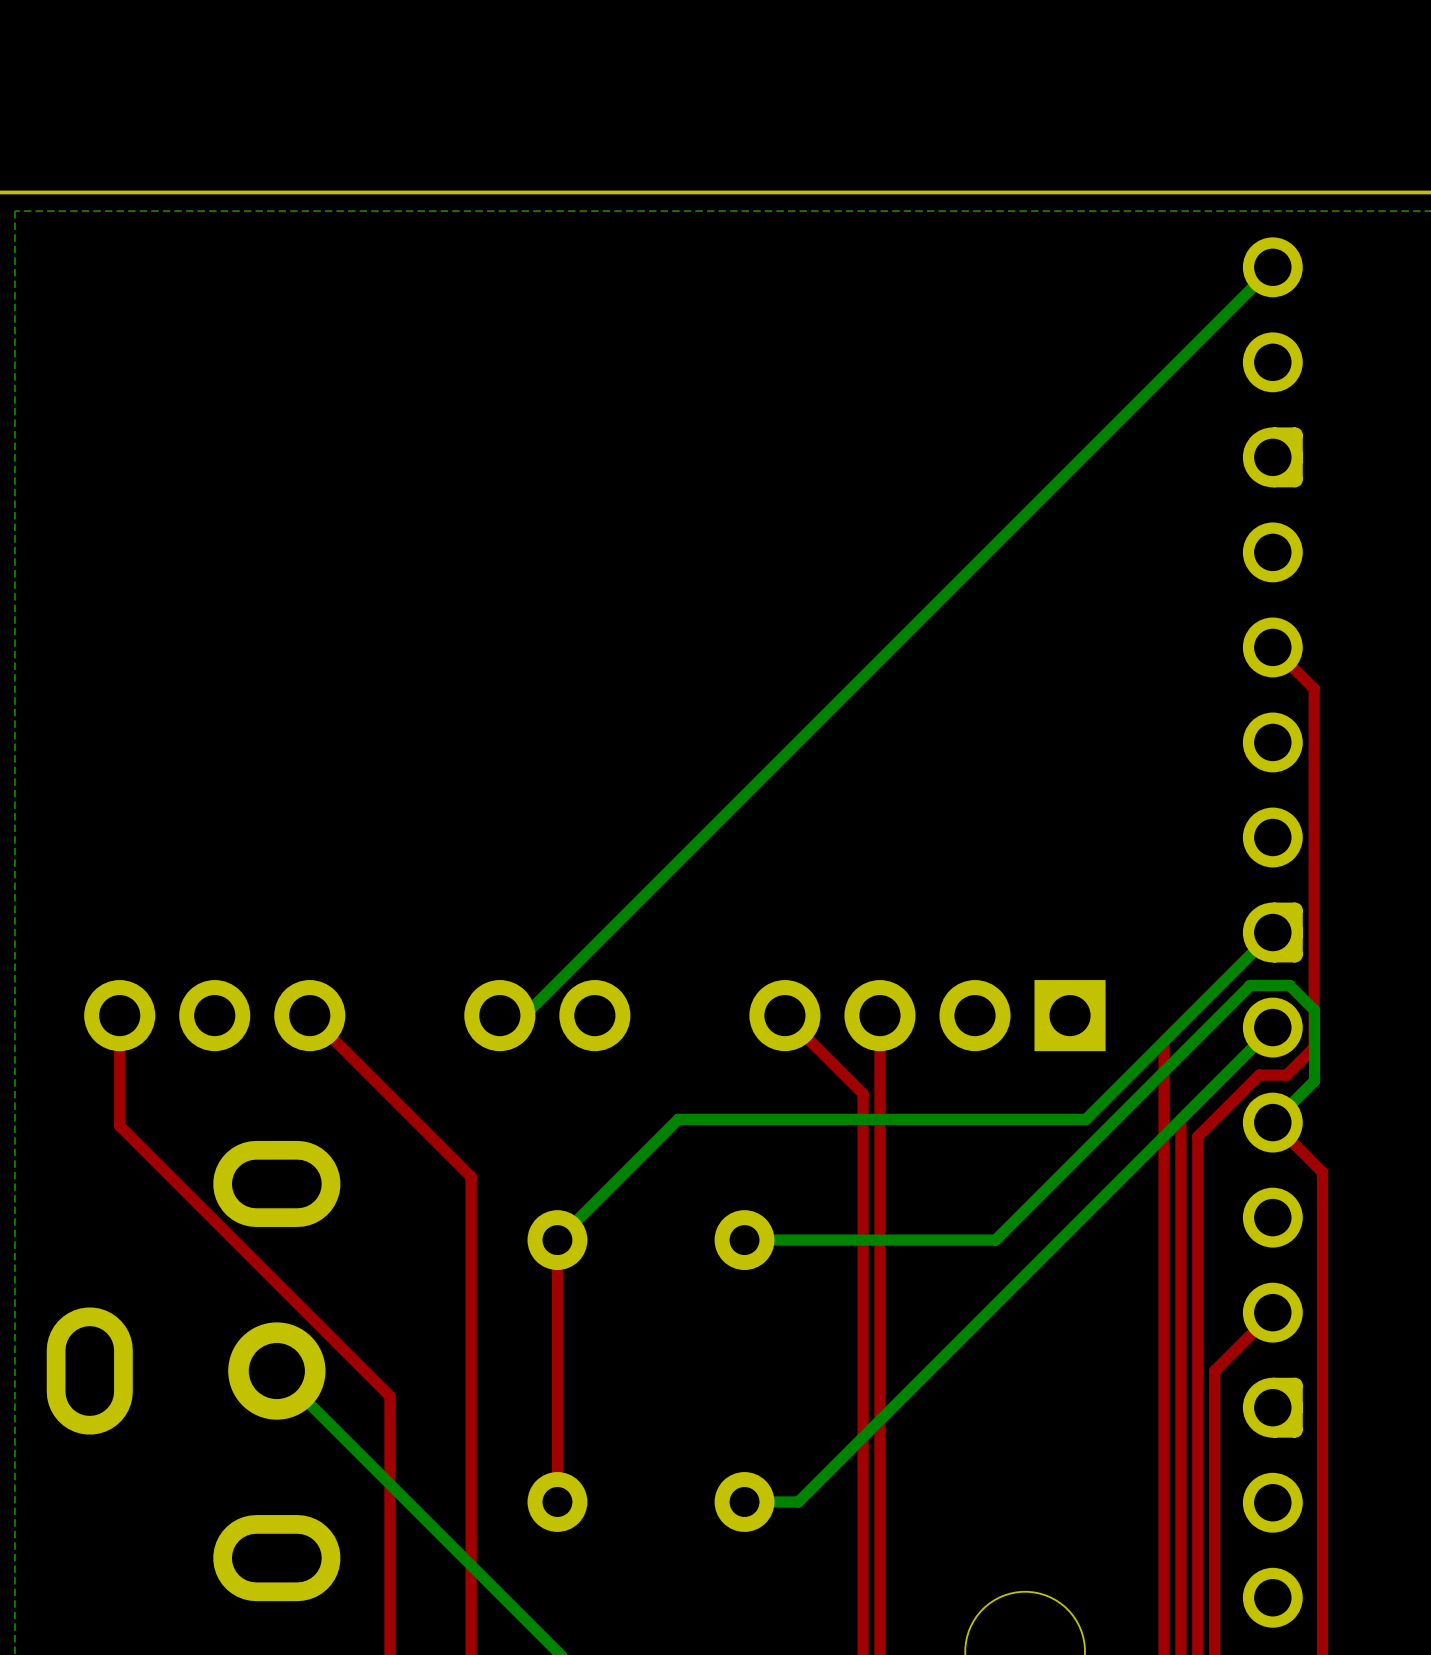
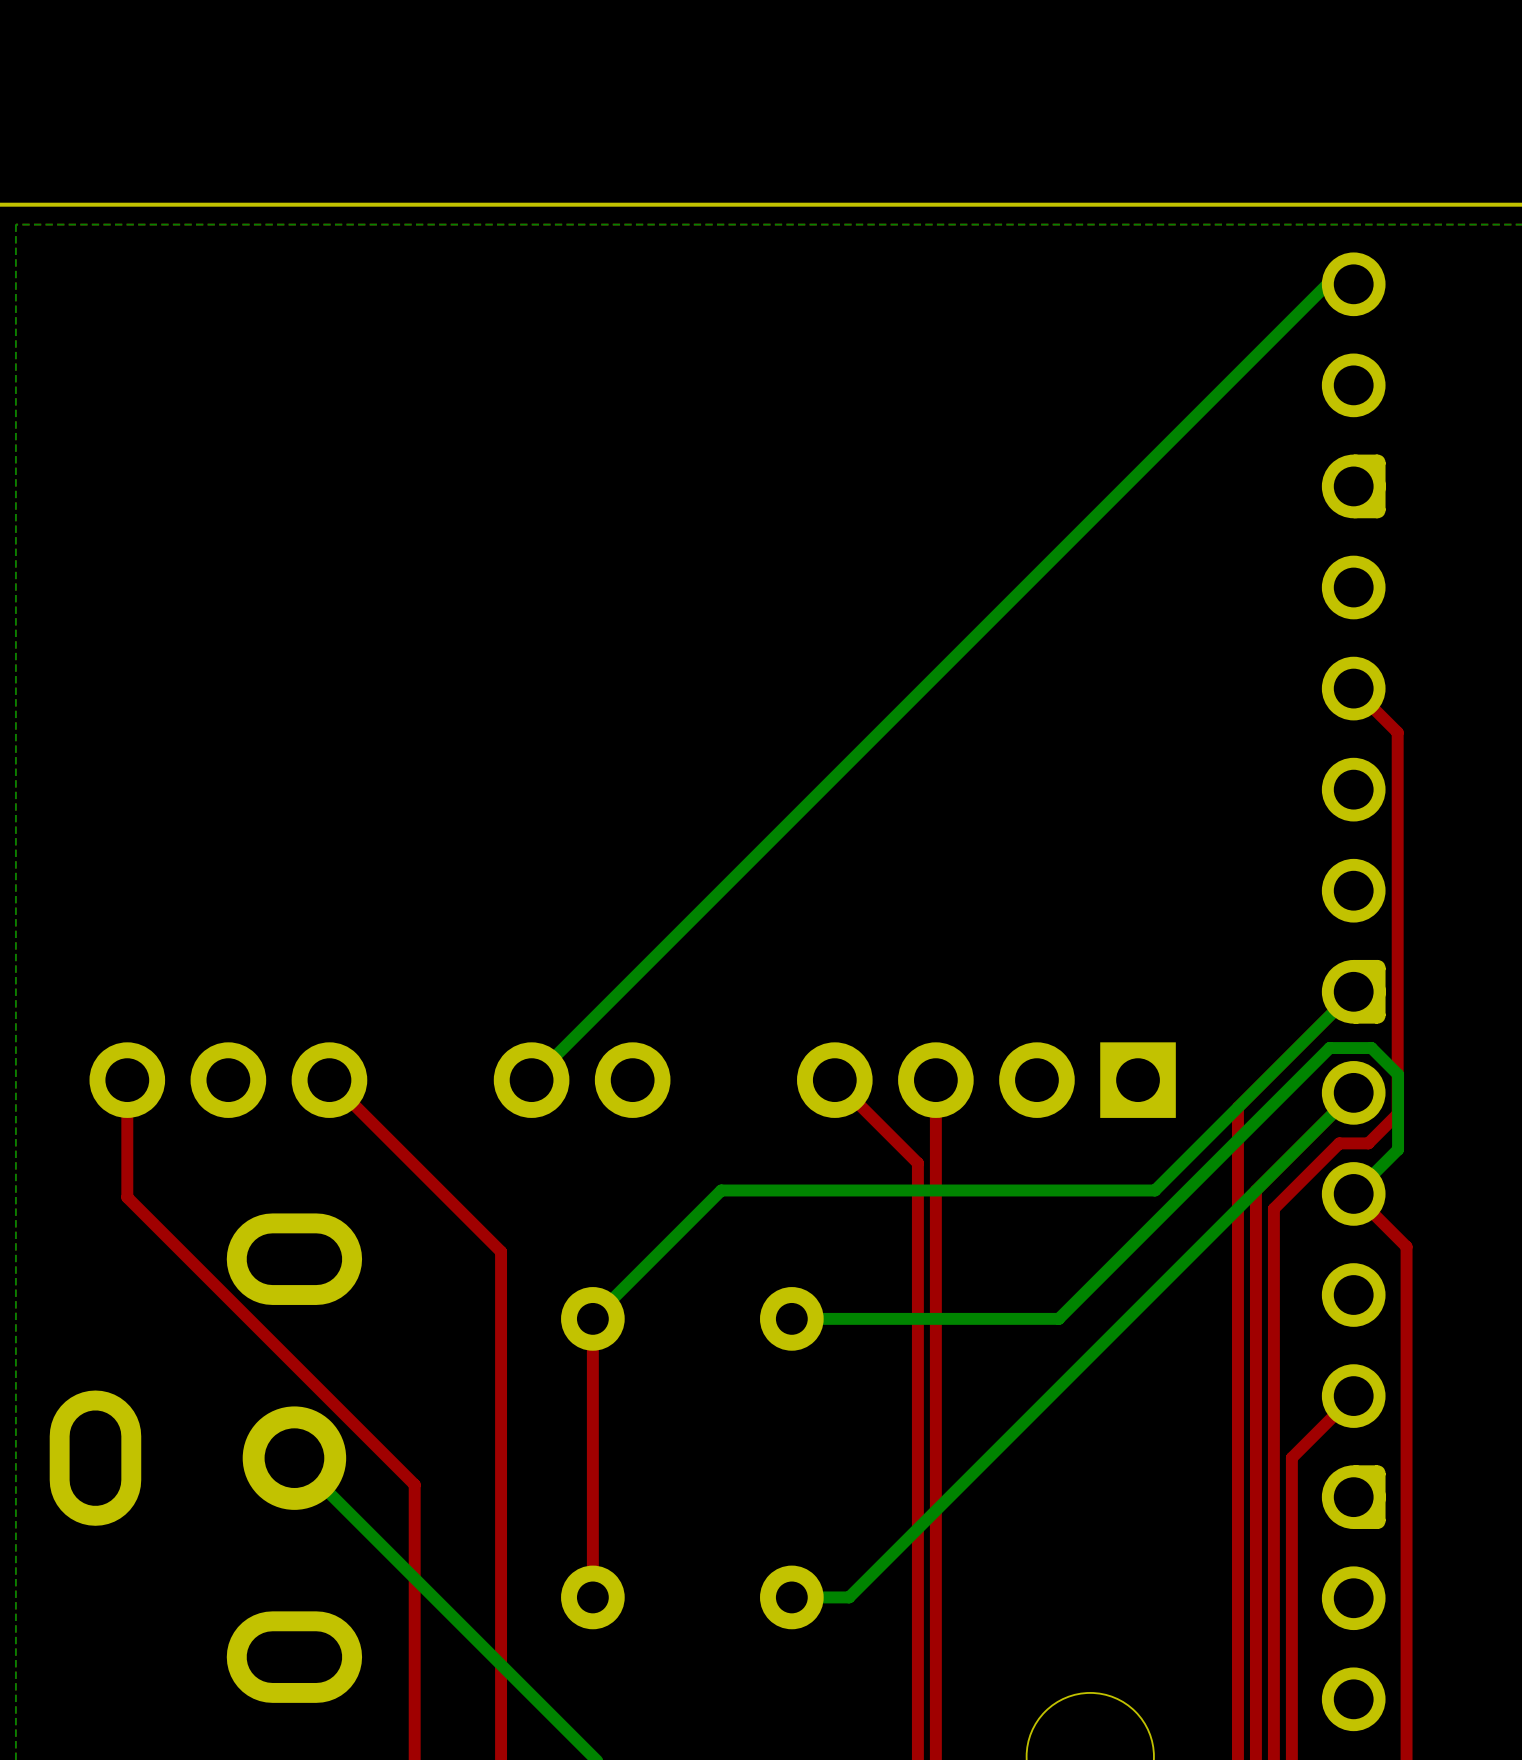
bottom track: (1272, 267) (524, 1015) (499, 1015) -> (1353, 284) (1327, 284) (531, 1080)

